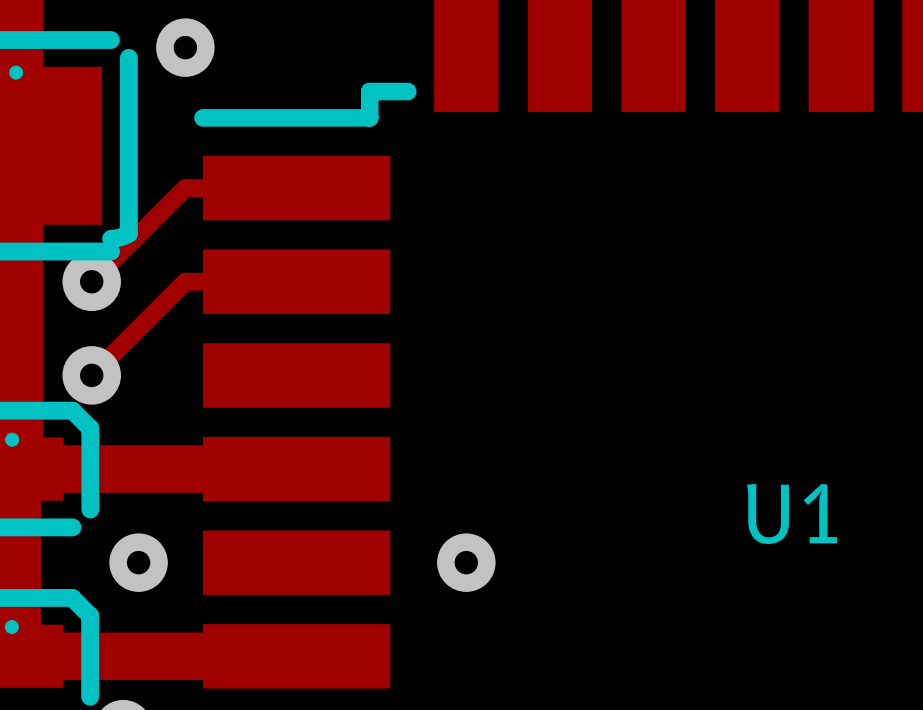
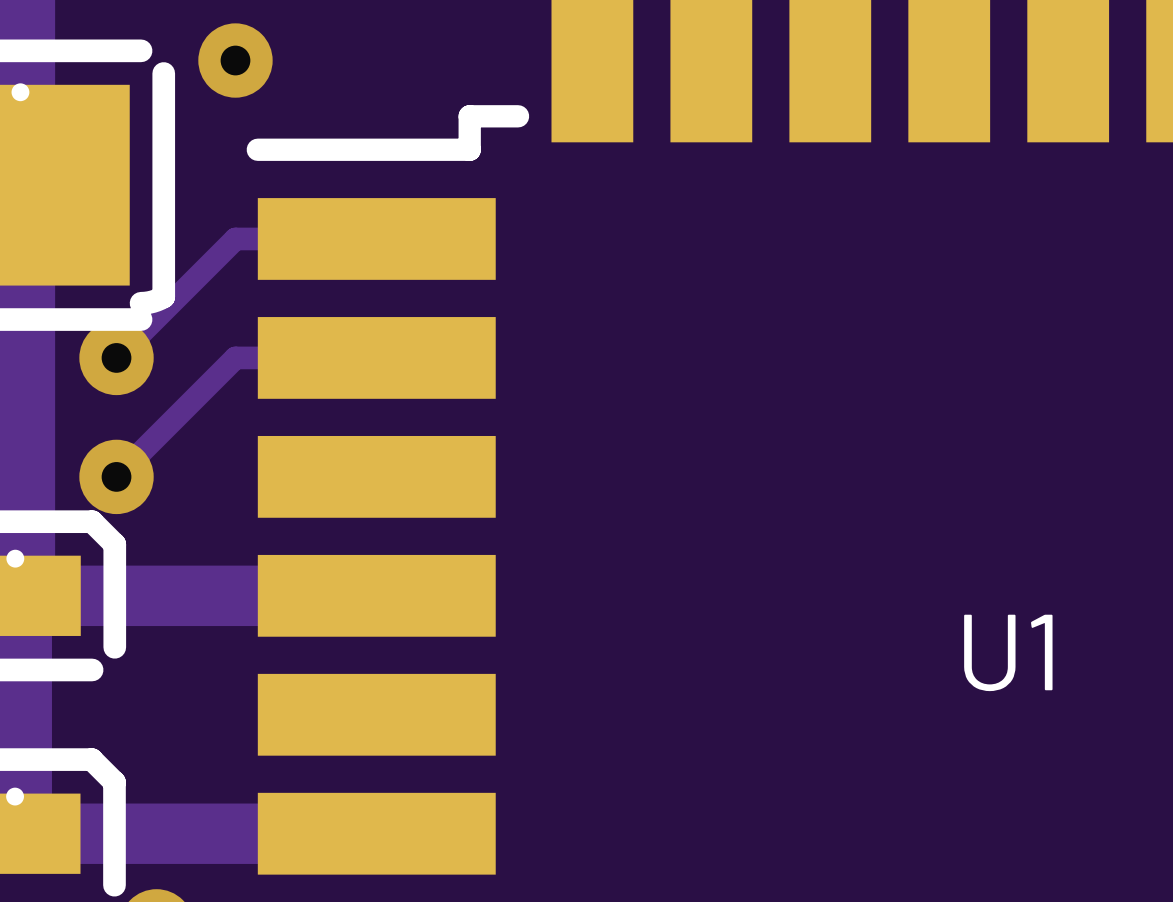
via: (138, 562) -> none
via: (466, 562) -> none

